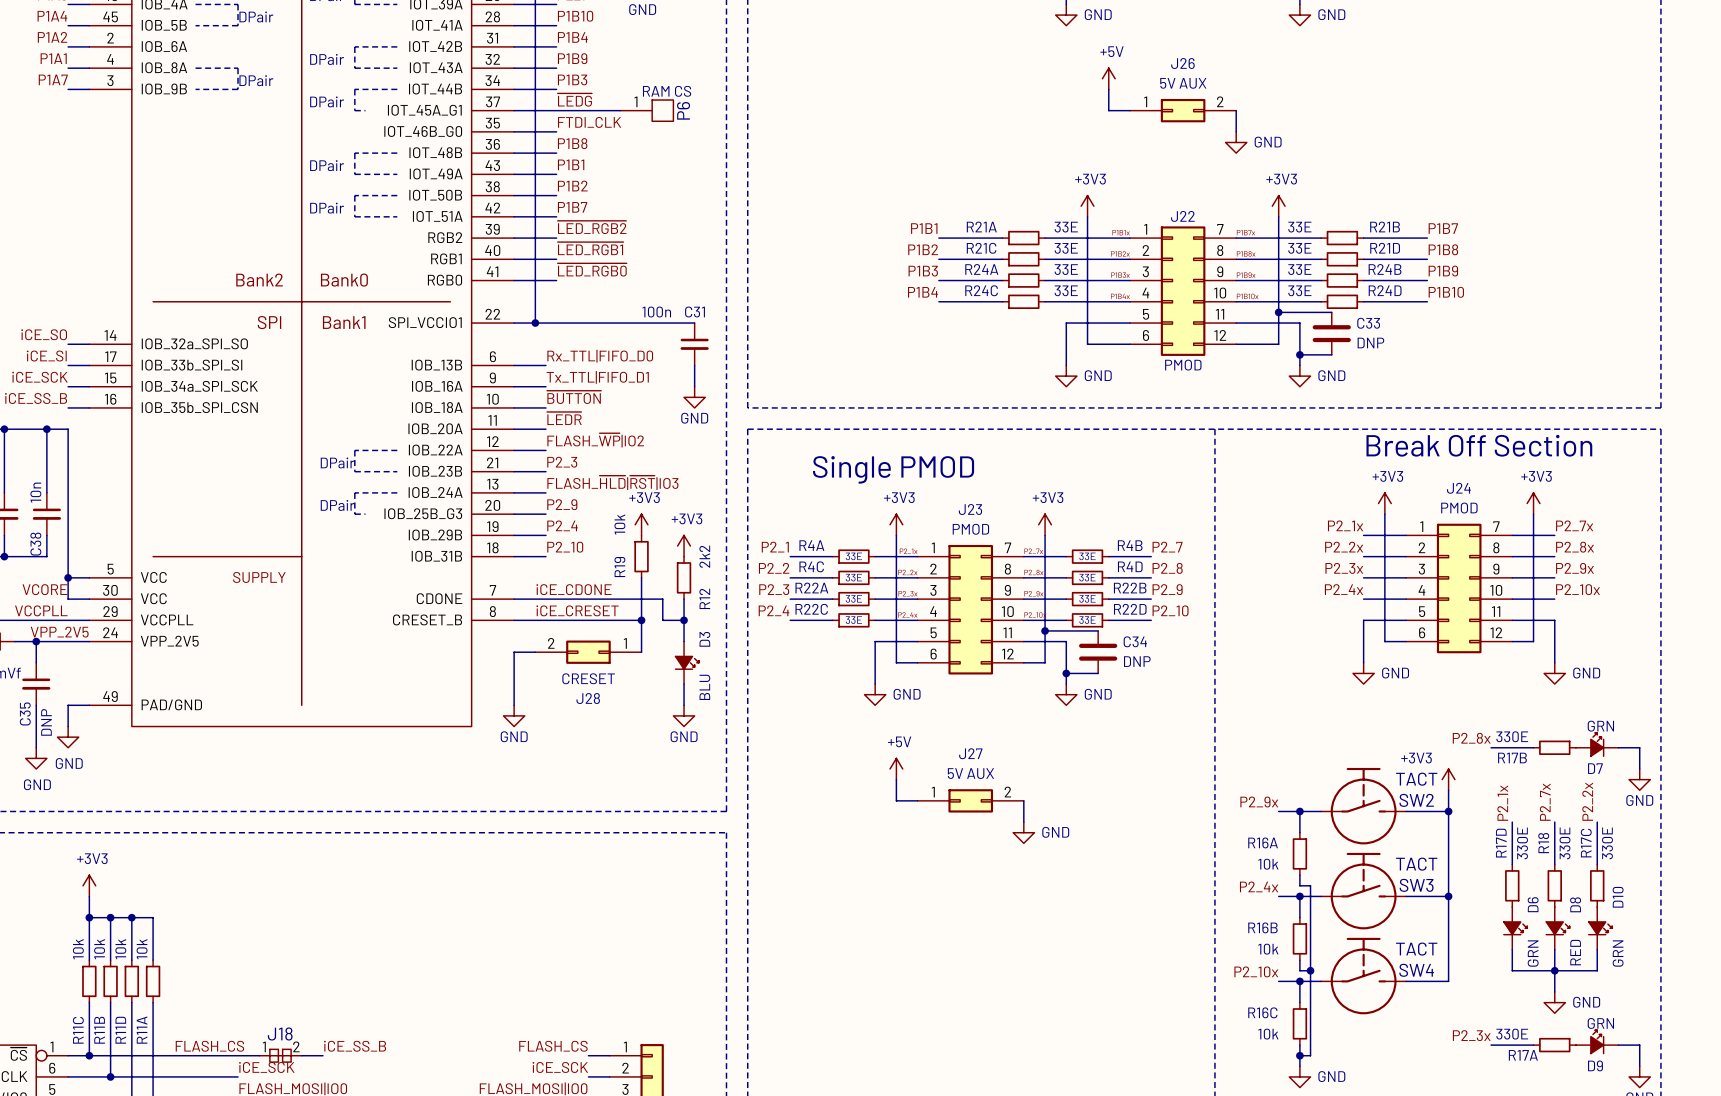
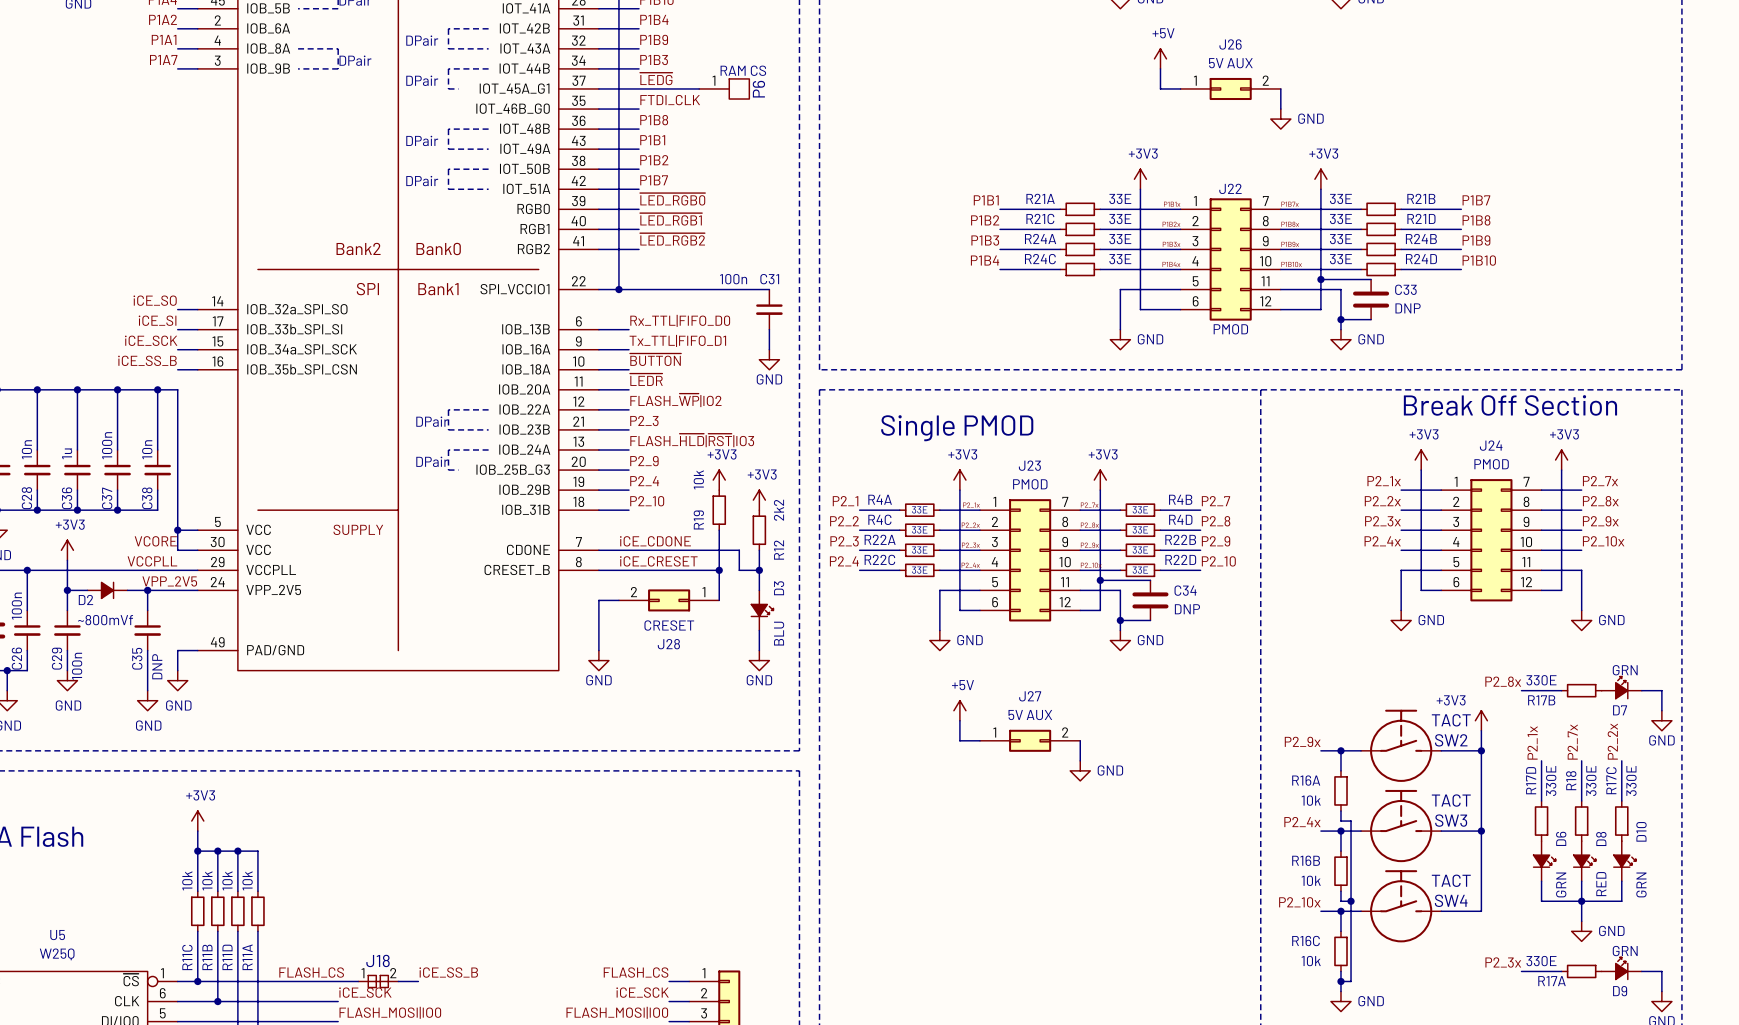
label: ~{LED_RGB2} (592, 227) -> ~{LED_RGB0} (672, 199)
part pin name: RGB2 (445, 237) -> RGB0 (533, 208)
label: ~{LED_RGB0} (592, 269) -> ~{LED_RGB2} (672, 239)
part pin name: RGB0 (444, 280) -> RGB2 (533, 249)

